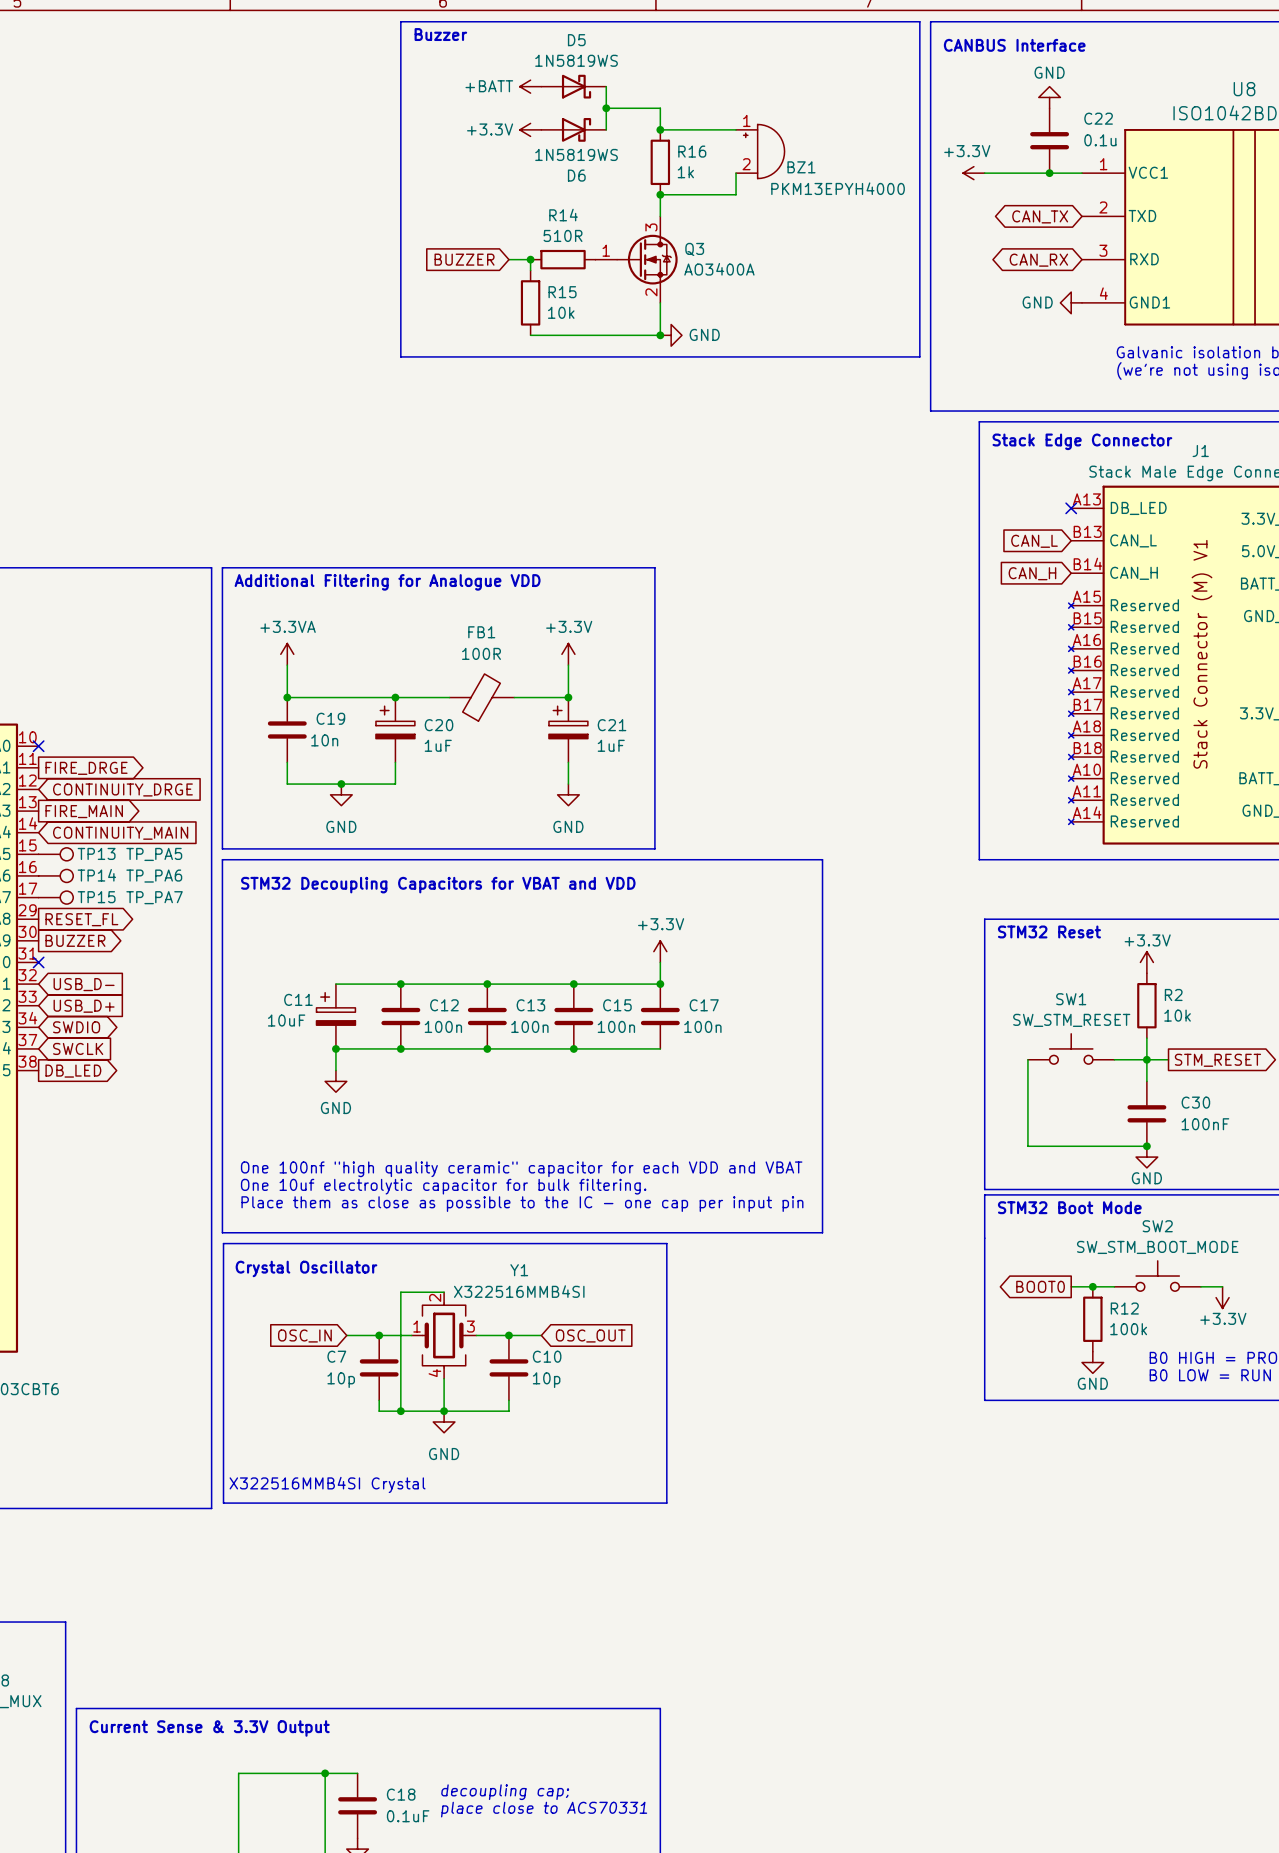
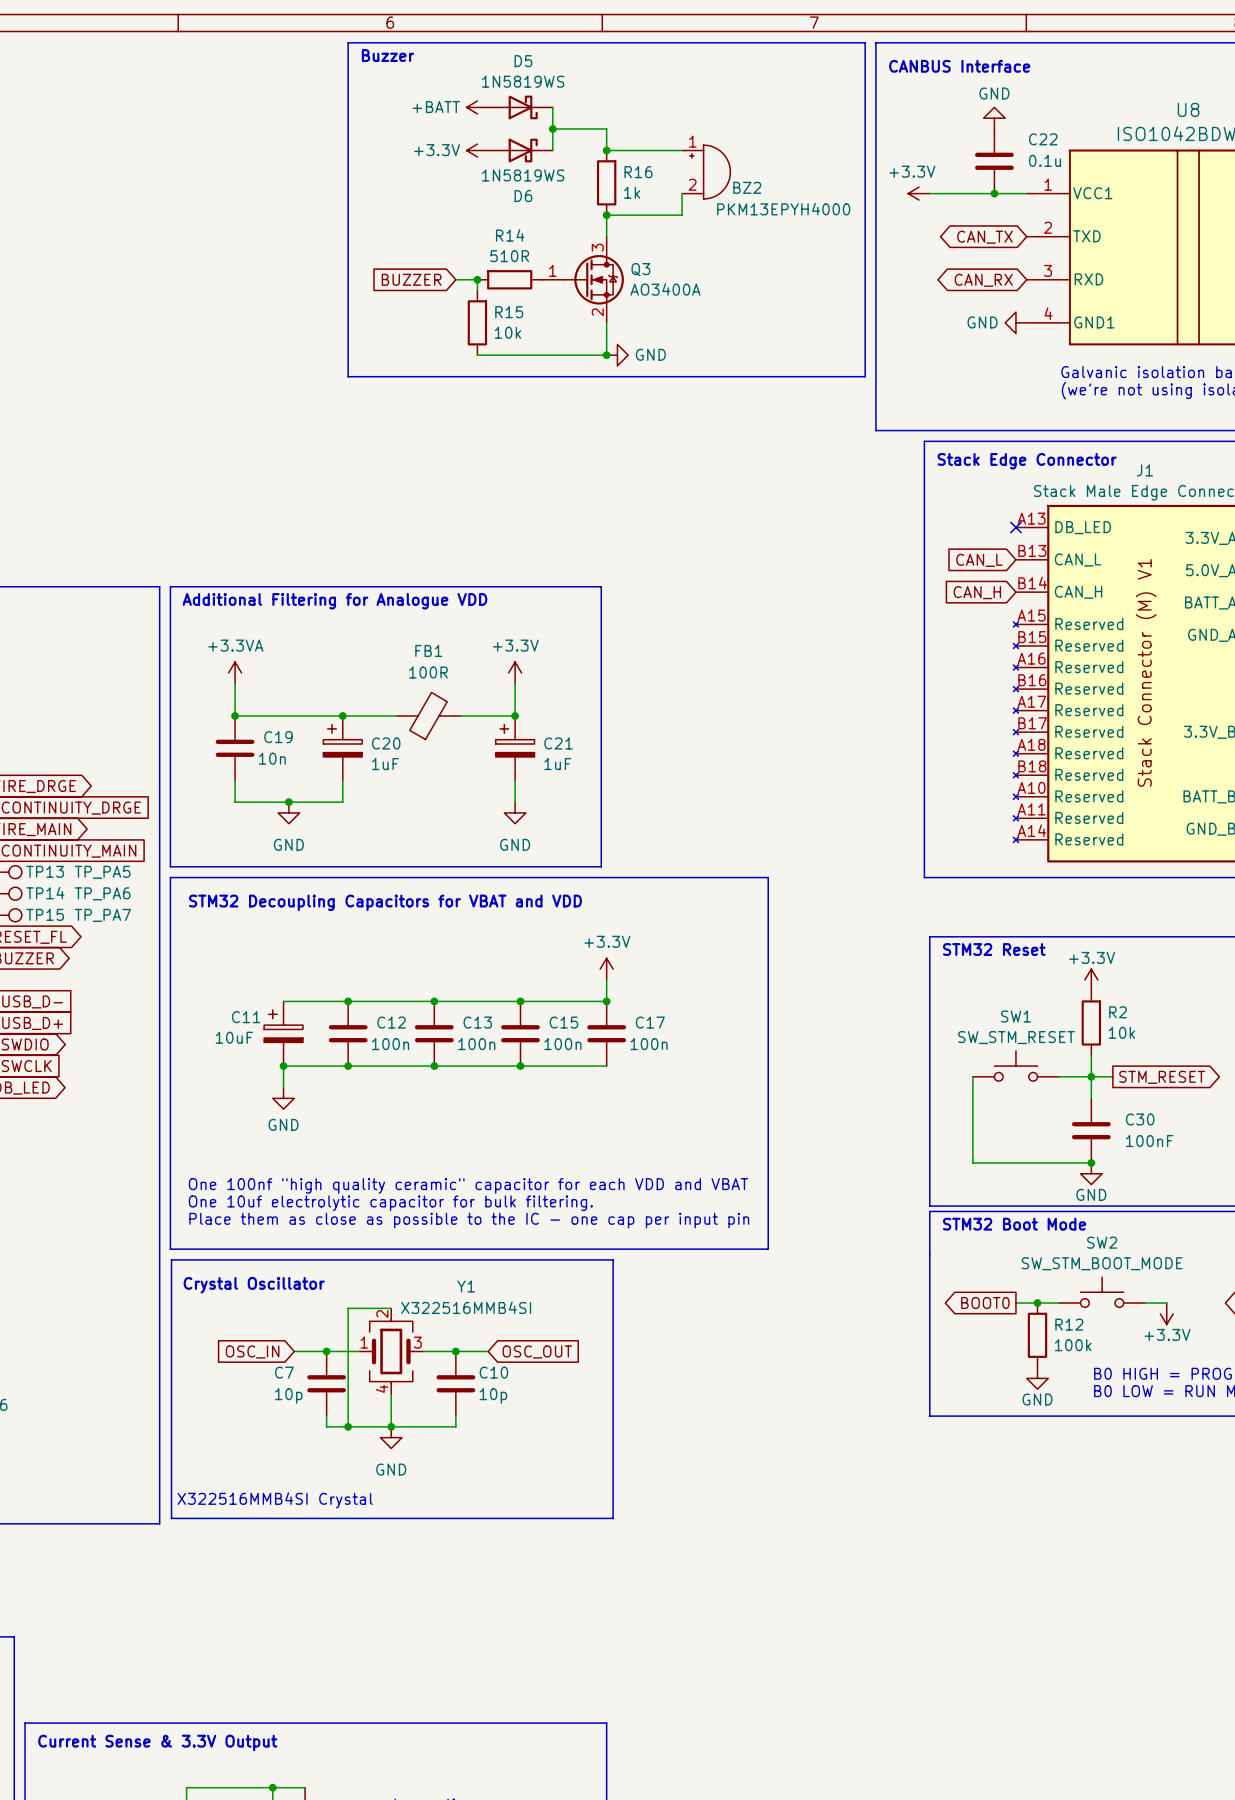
BZ1 name: BZ1 (801, 167) -> BZ2 (747, 187)

